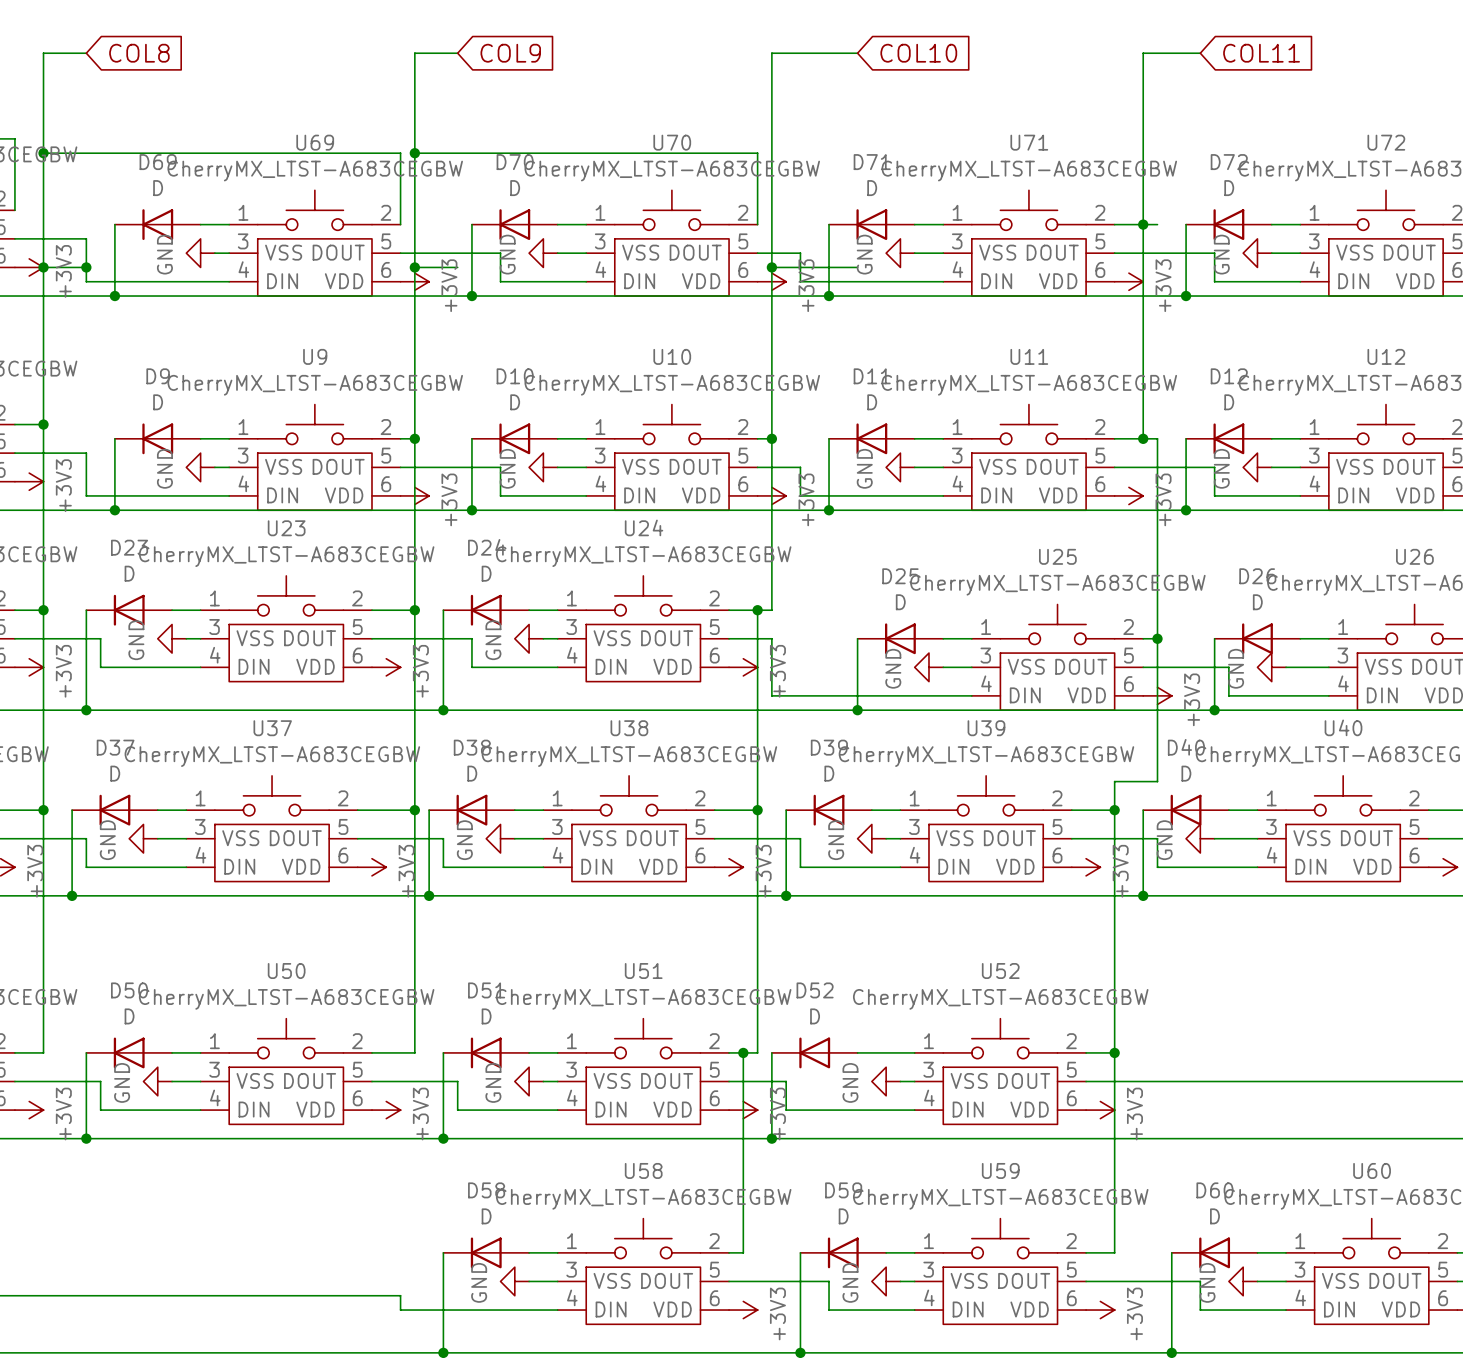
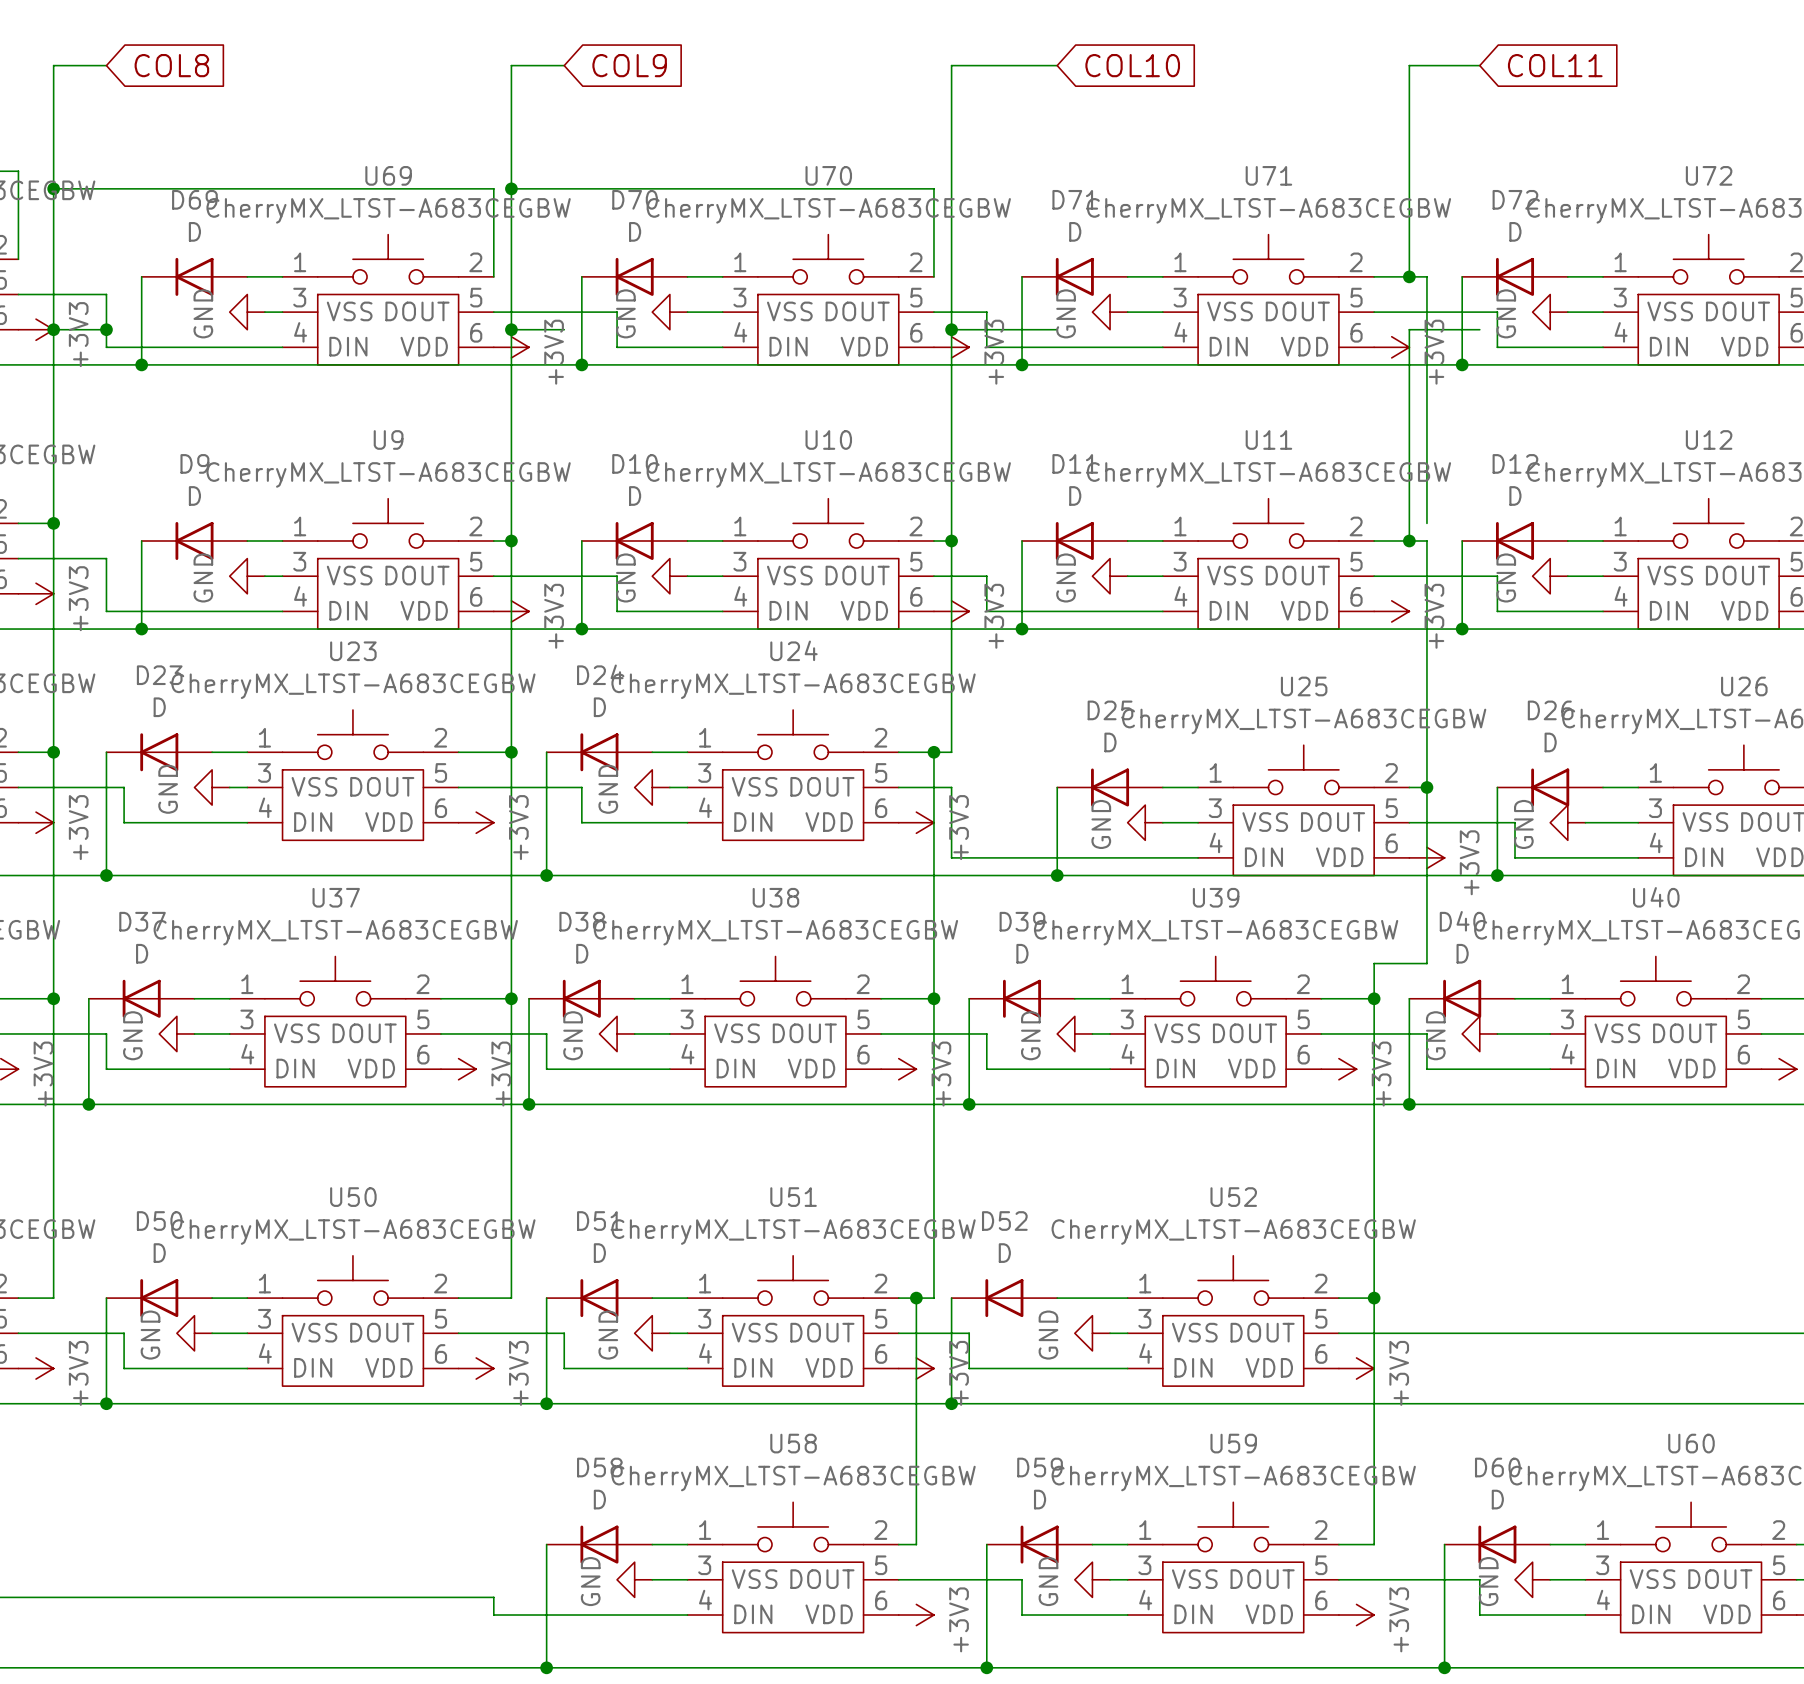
wire: (1143, 224) (1143, 267) -> (1479, 329) (1409, 329)
wire: none -> (1426, 276) (1426, 523)

